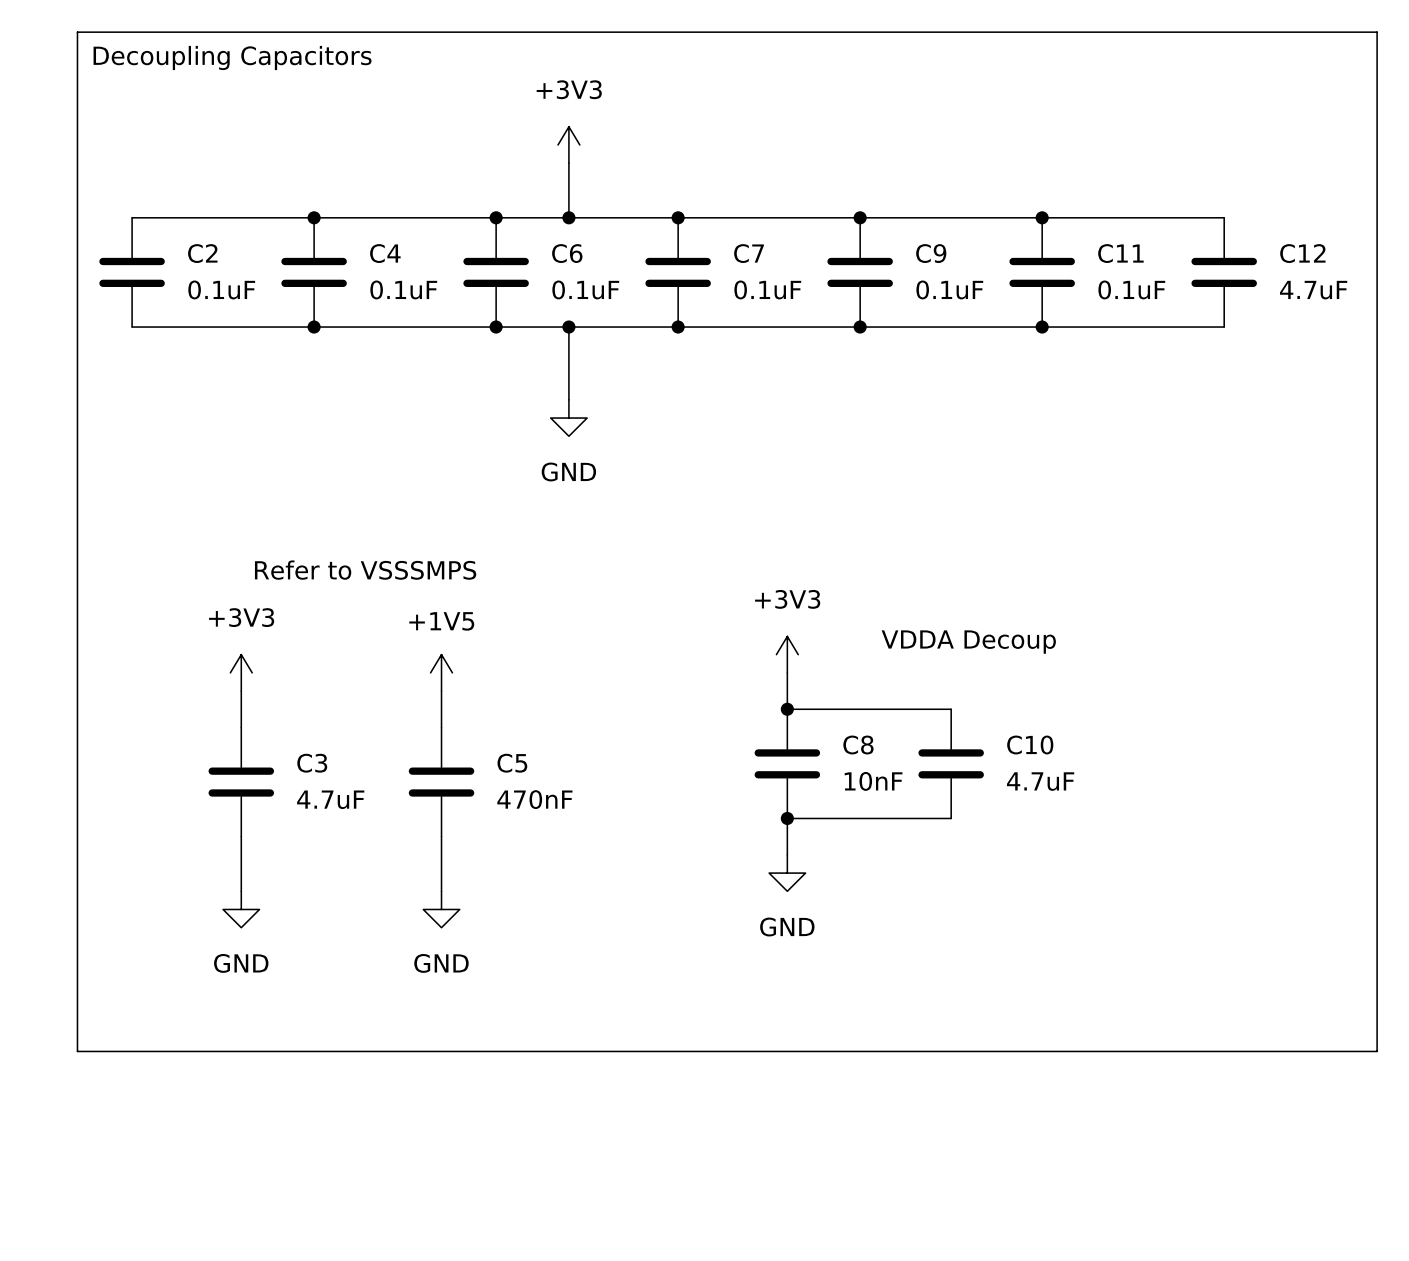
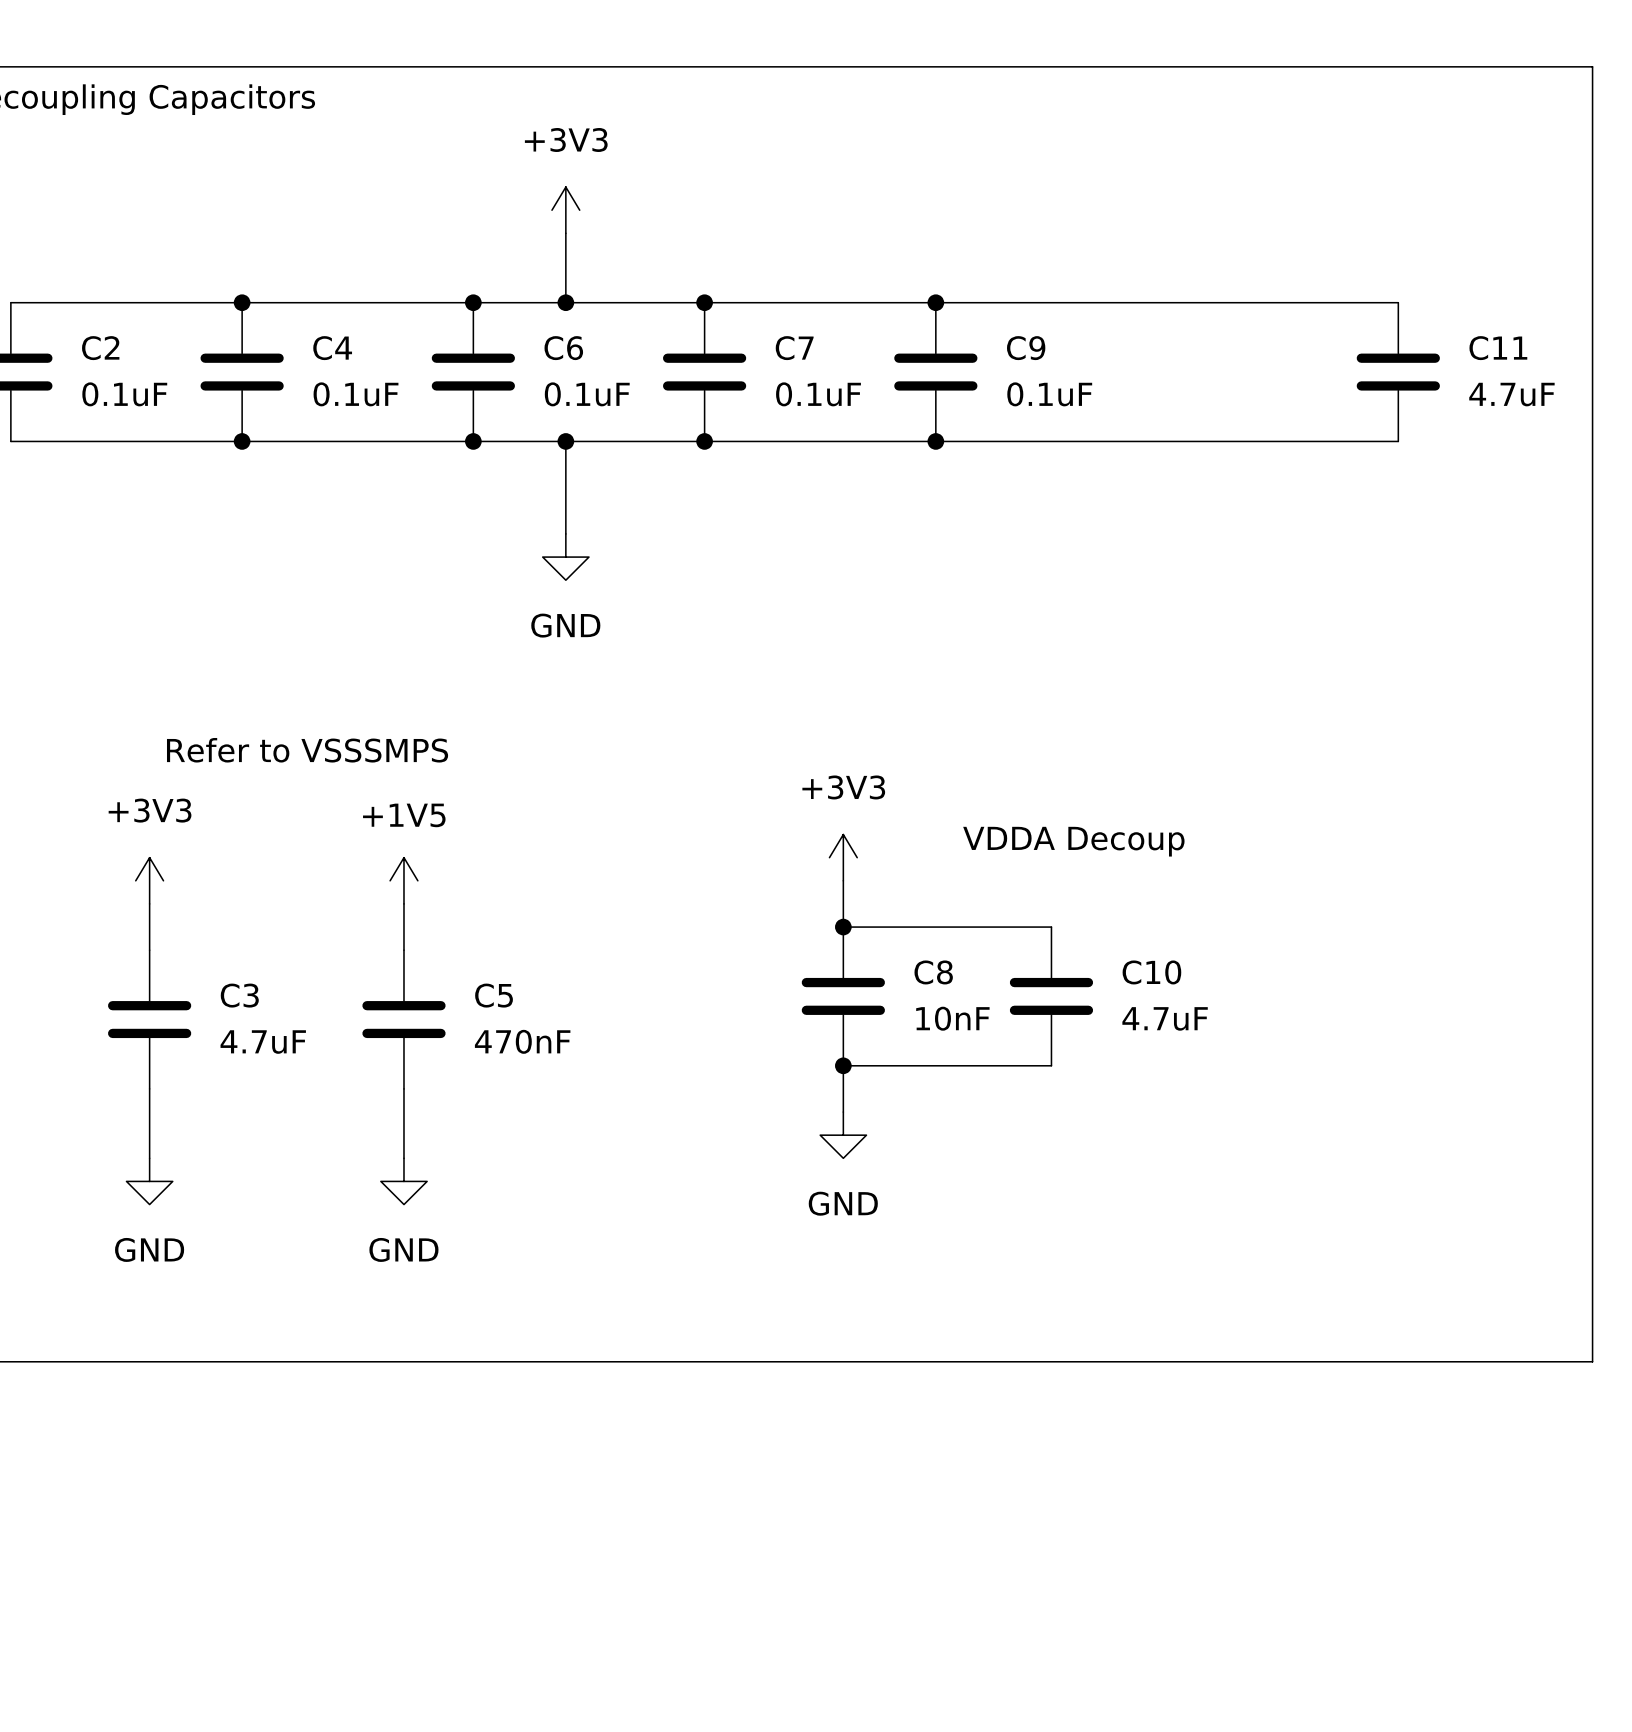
junction: (1042, 217) -> none
C12 name: C12 (1302, 253) -> C11 (1498, 348)
C11: 0.1uF (1042, 272) -> none
junction: (1042, 327) -> none

